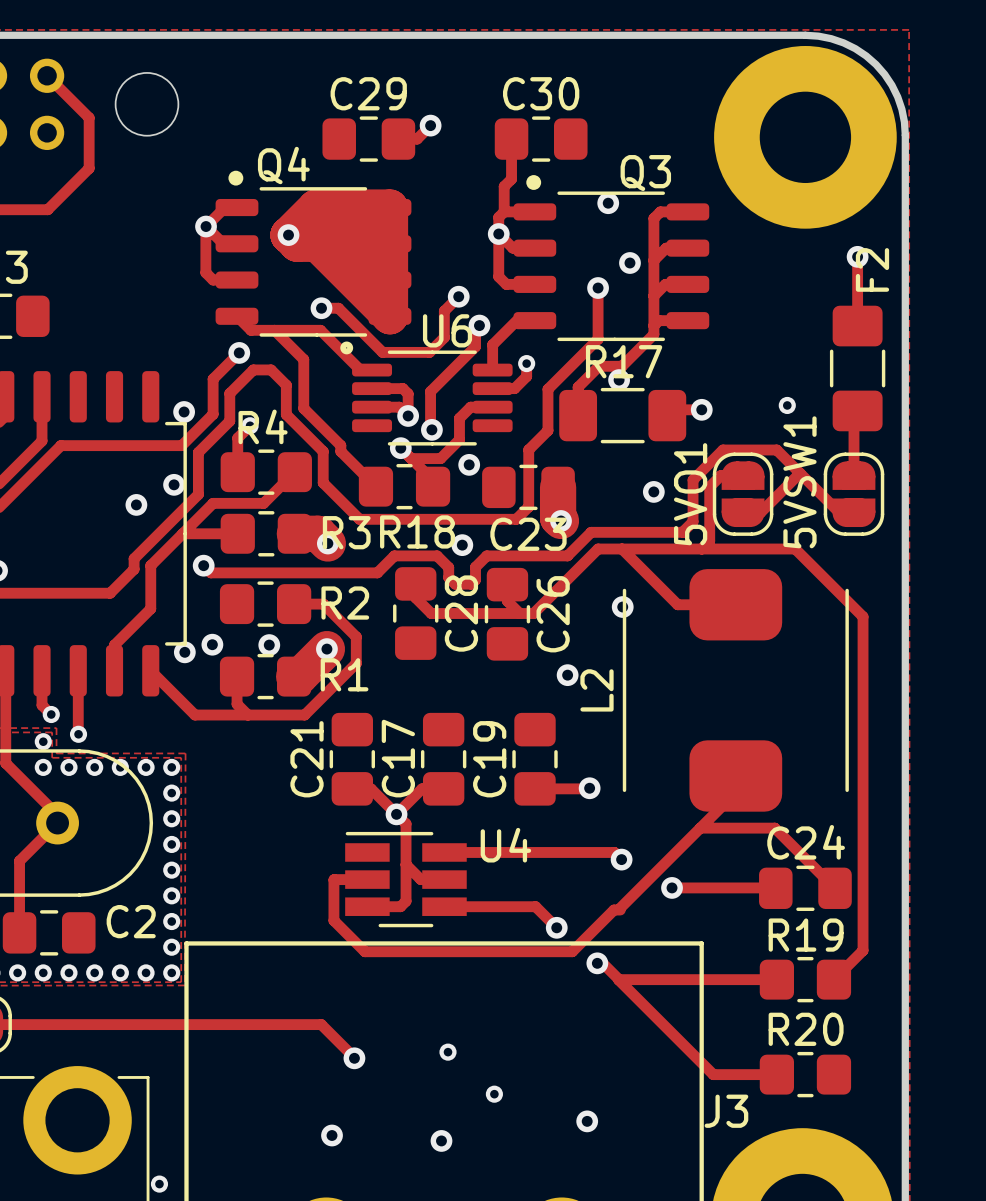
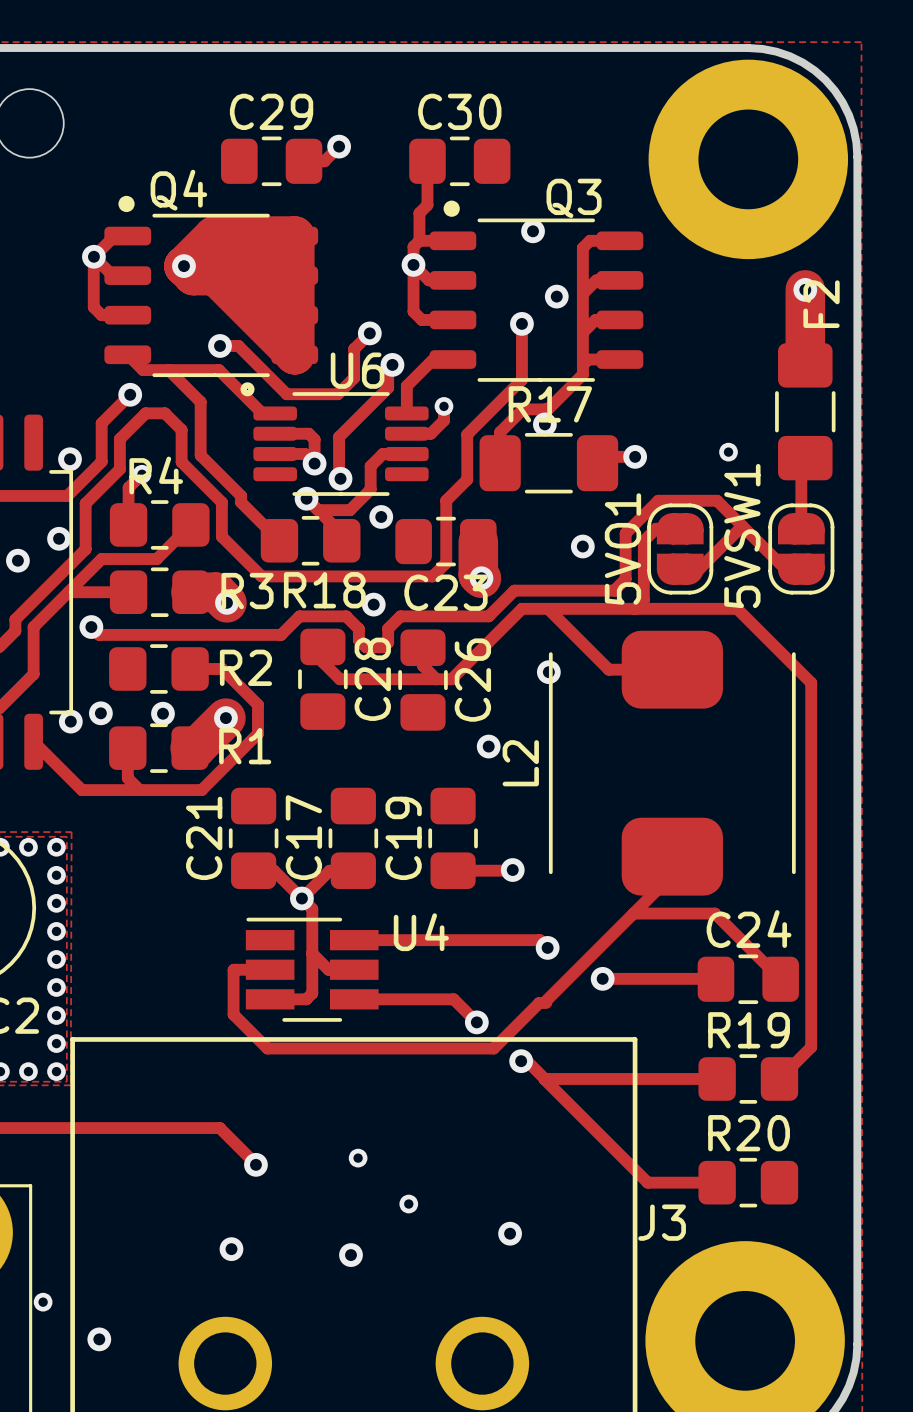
track width: thin (857, 256) (857, 326) -> thick (805, 289) (805, 365)

